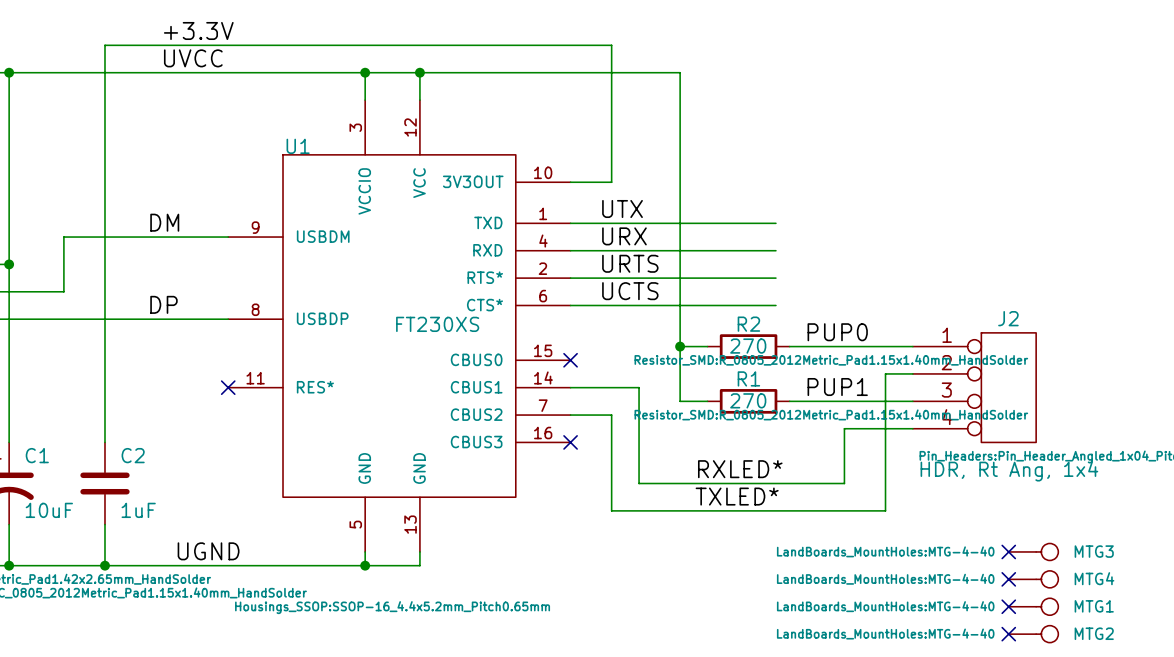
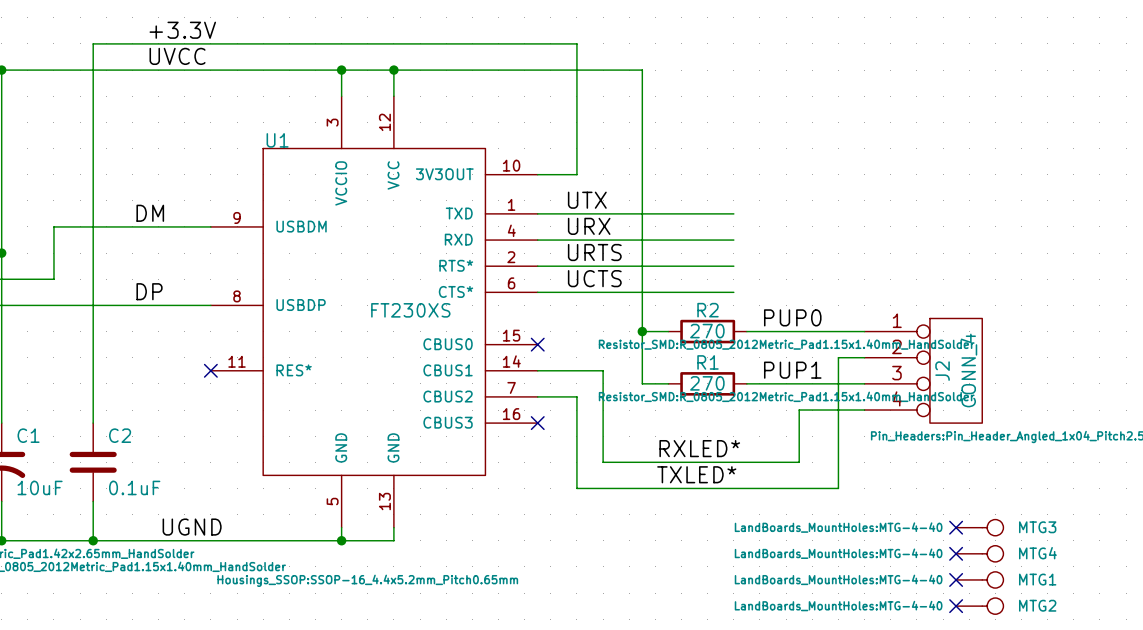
J2 name rotation: 0° (1008, 318) -> 90° counterclockwise (942, 371)
J2 name position: J2 (1008, 318) -> J2 (942, 371)
J2 value: HDR, Rt Ang, 1x4 (1009, 471) -> CONN_4 (969, 370)
C2 value: 1uF (138, 510) -> 0.1uF (134, 487)

